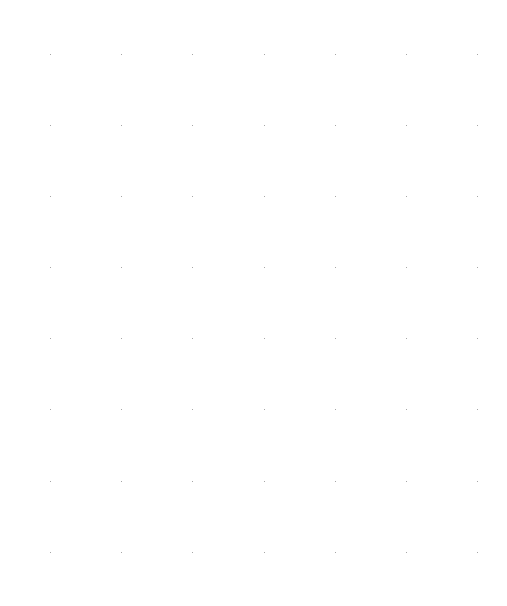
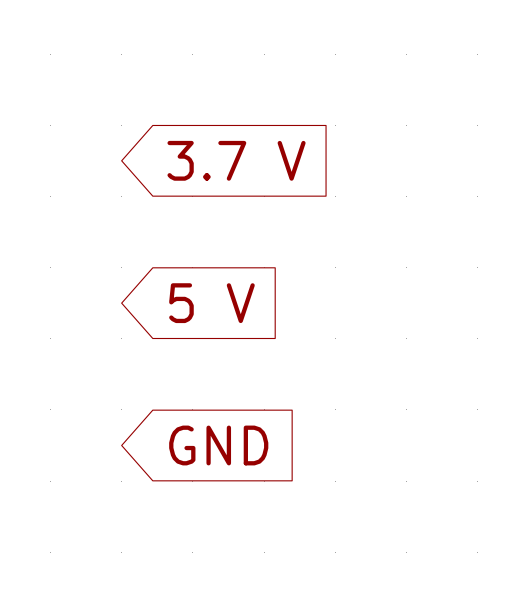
global label: none -> 3.7 V (236, 160)
global label: none -> 5 V (211, 303)
global label: none -> GND (218, 445)

